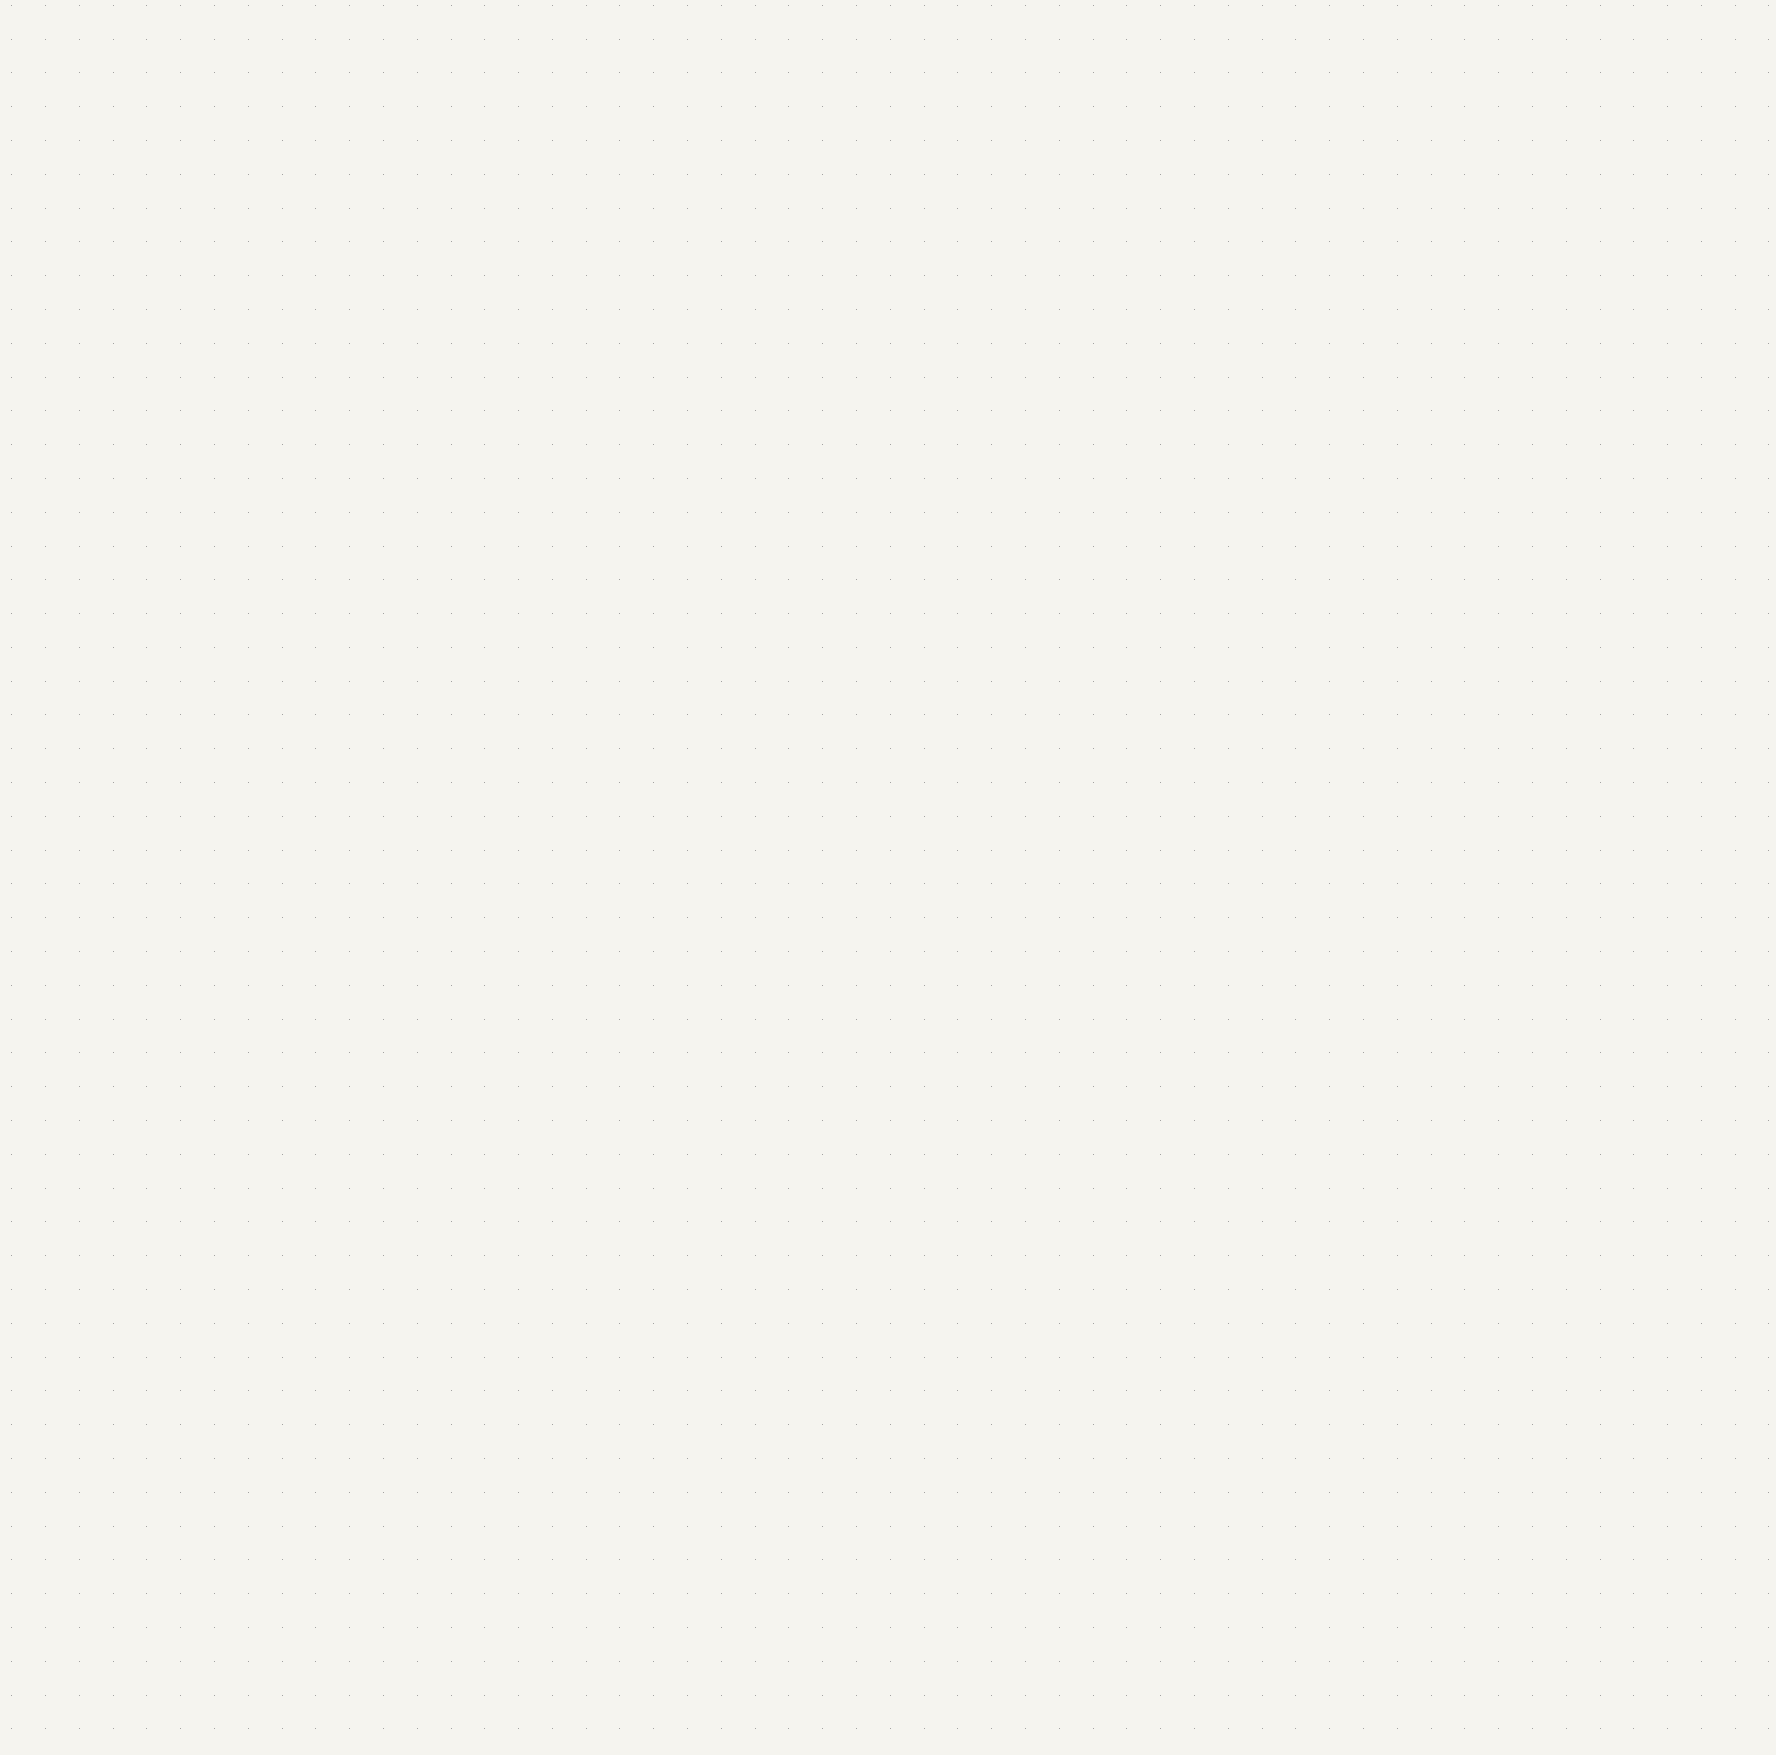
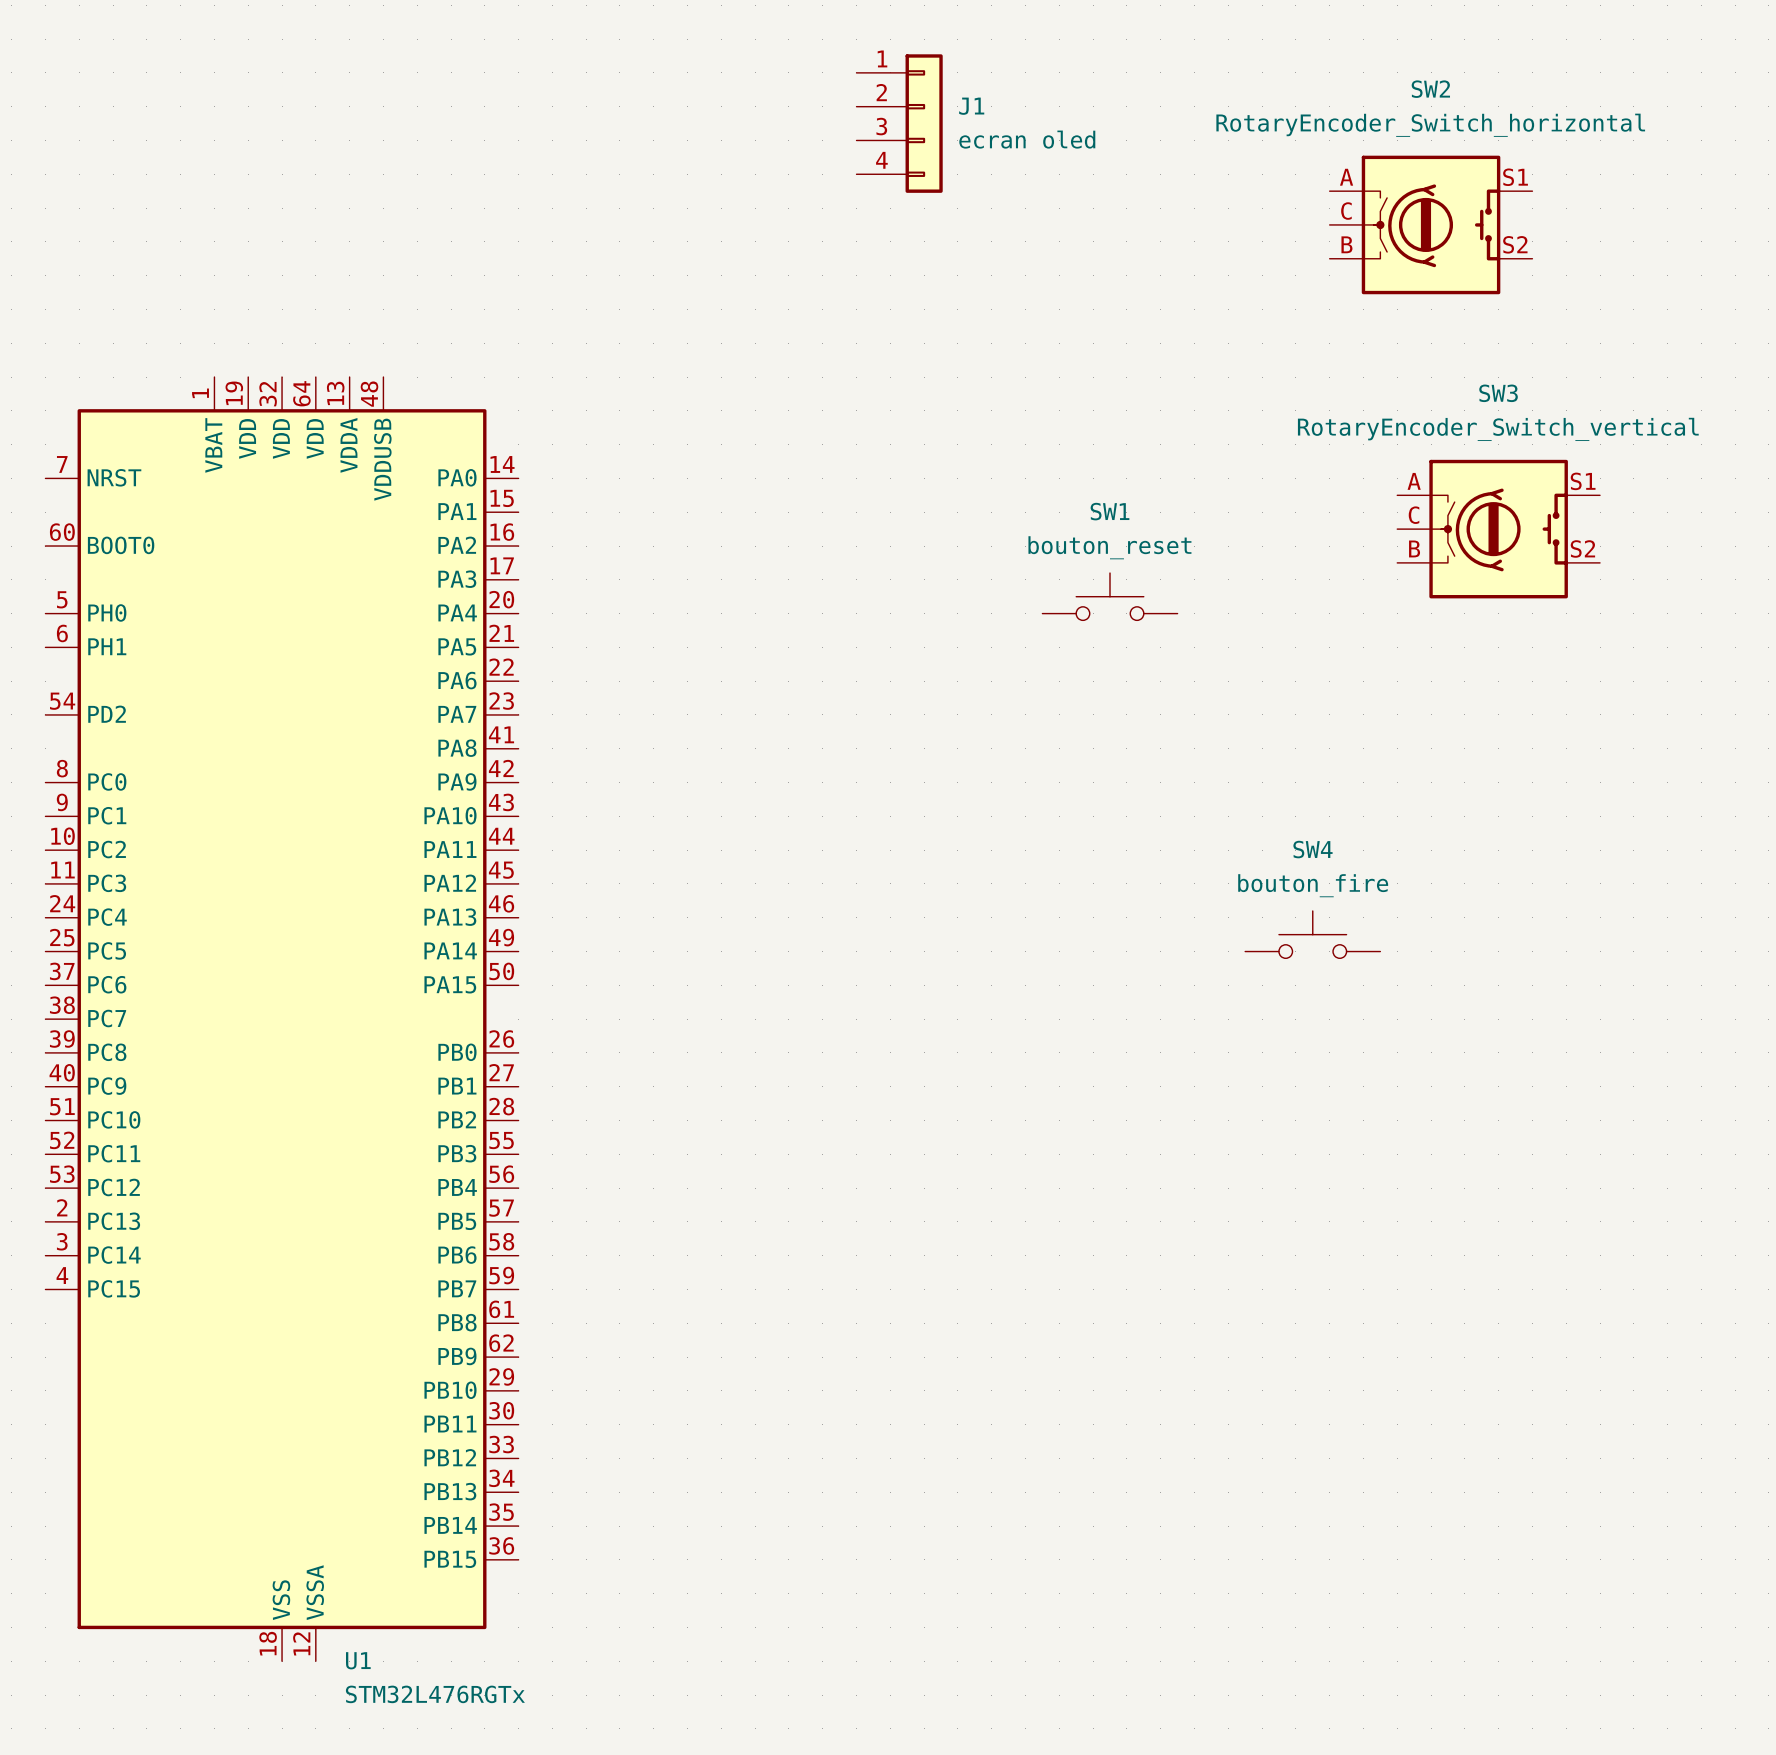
J1: none -> ecran oled (899, 123)
SW2: none -> RotaryEncoder_Switch_horizontal (1431, 224)
SW3: none -> RotaryEncoder_Switch_vertical (1498, 529)
SW1: none -> bouton_reset (1109, 596)
SW4: none -> bouton_fire (1312, 934)
U1: none -> STM32L476RGTx (282, 1019)

